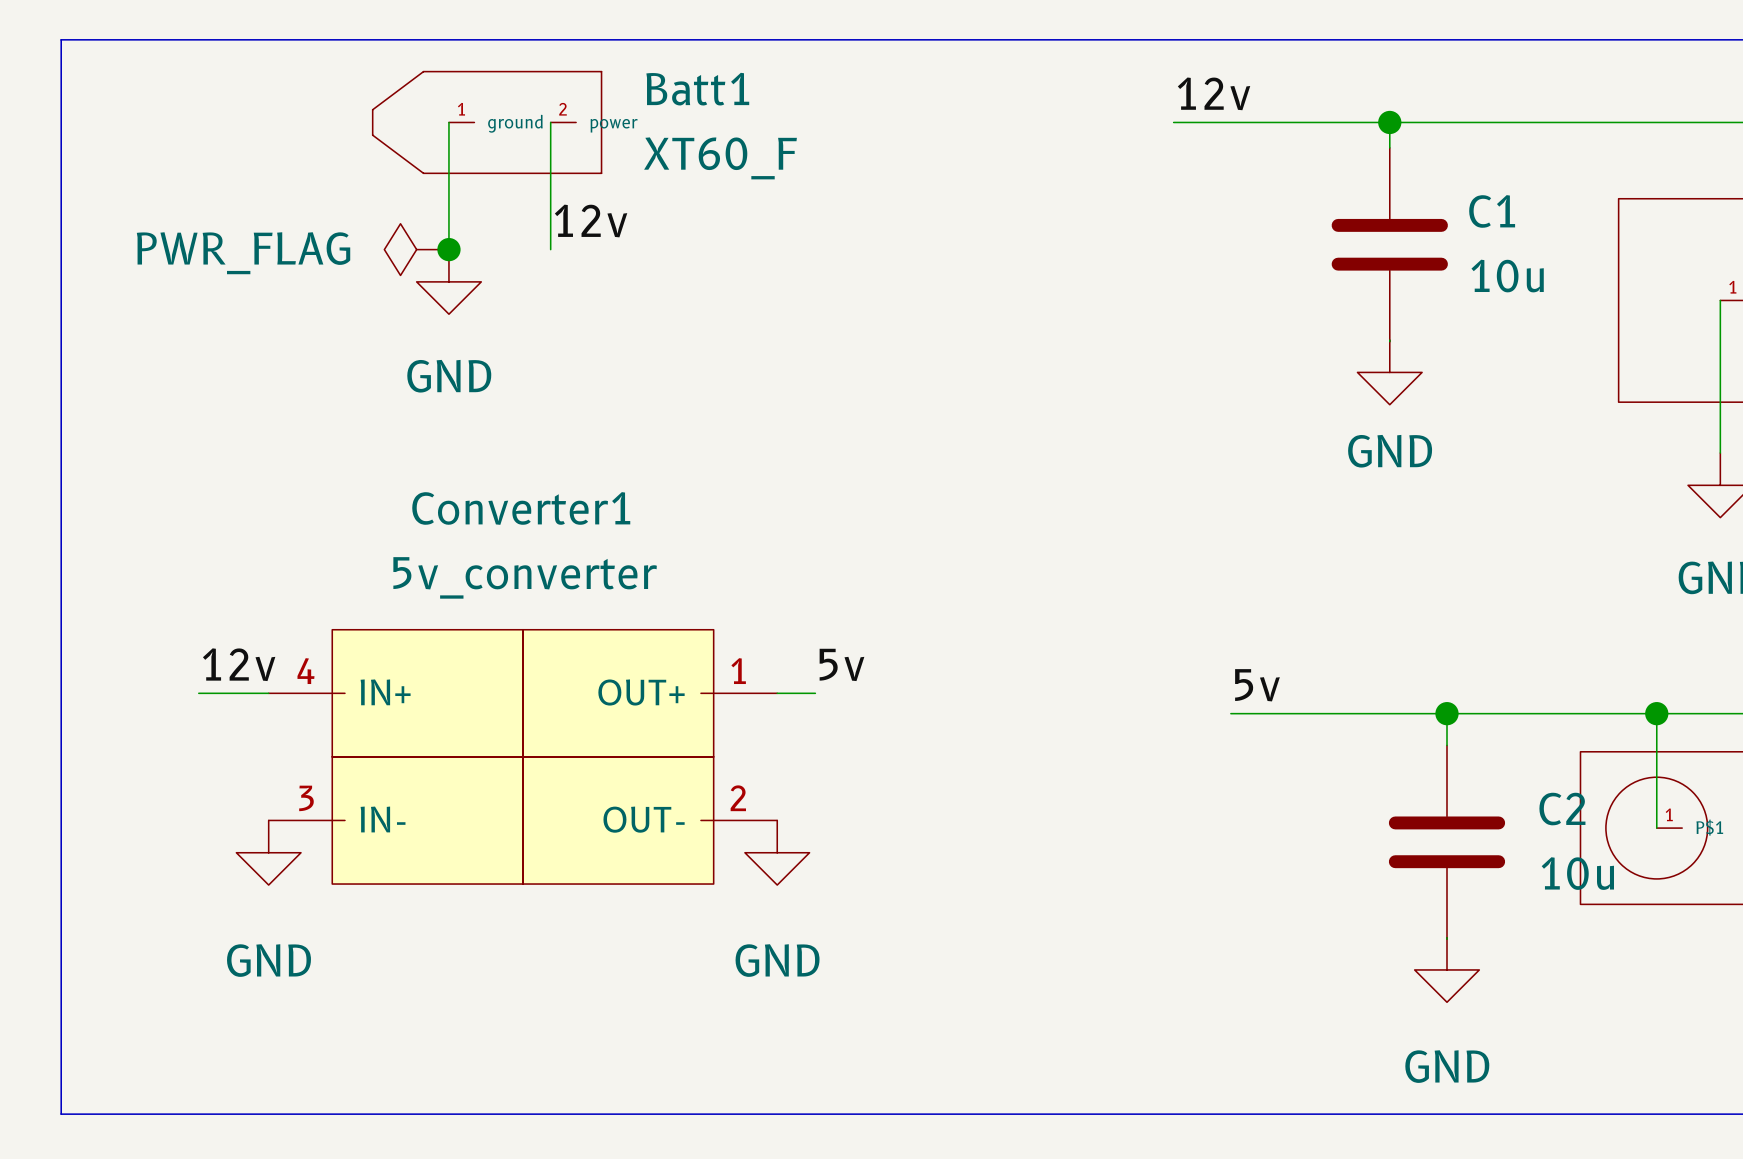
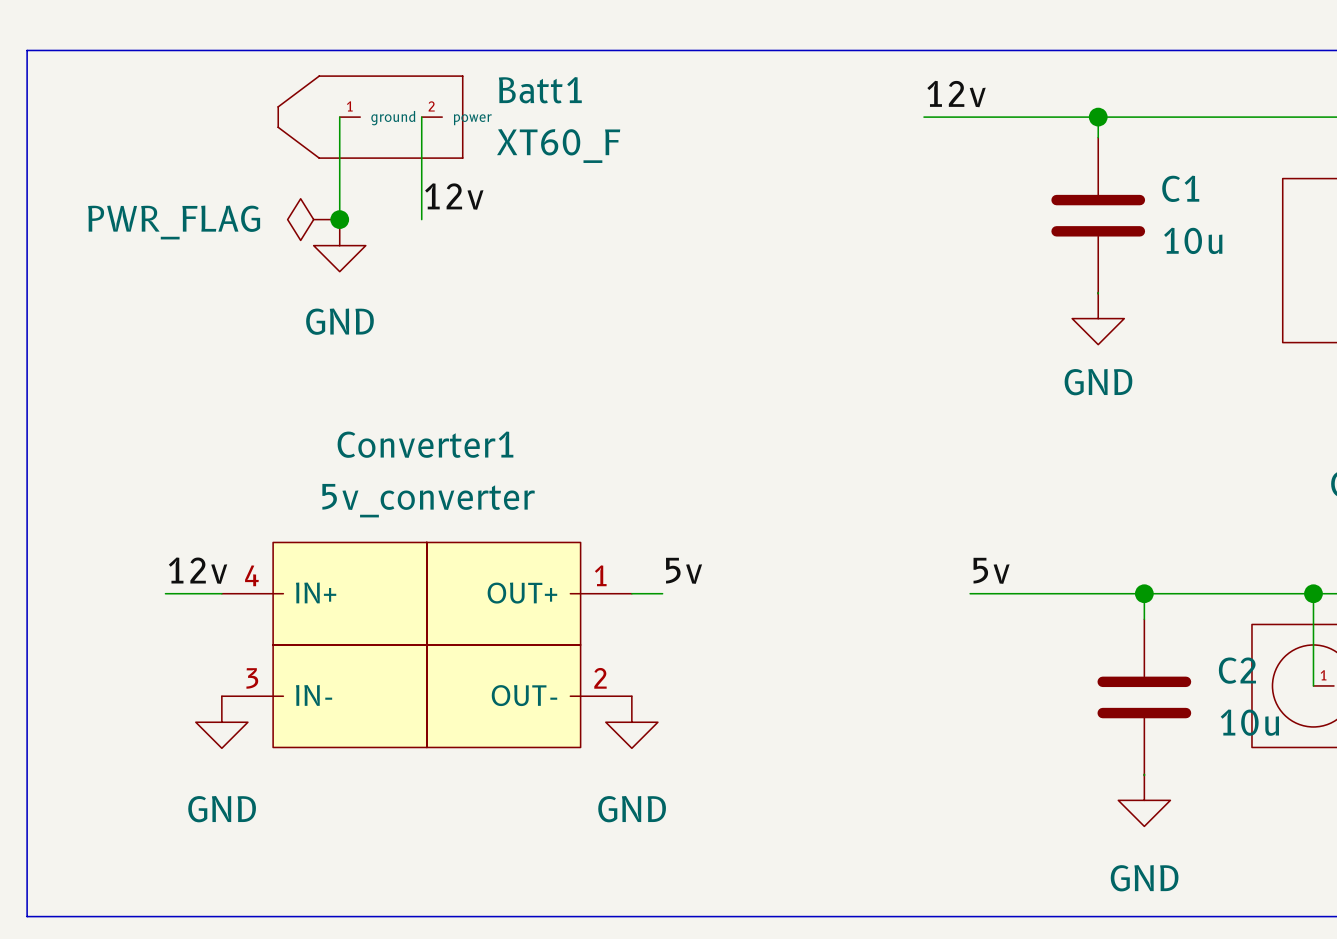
label position: 12v (239, 664) -> 12v (198, 570)
label position: 5v (841, 664) -> 5v (684, 570)
wire: (198, 693) (268, 693) -> (165, 593) (221, 593)
wire: (777, 693) (815, 693) -> (631, 593) (662, 593)
Converter1 position: (522, 756) -> (426, 644)
power symbol position: GND (268, 852) -> GND (221, 722)
power symbol position: GND (777, 852) -> GND (631, 722)

